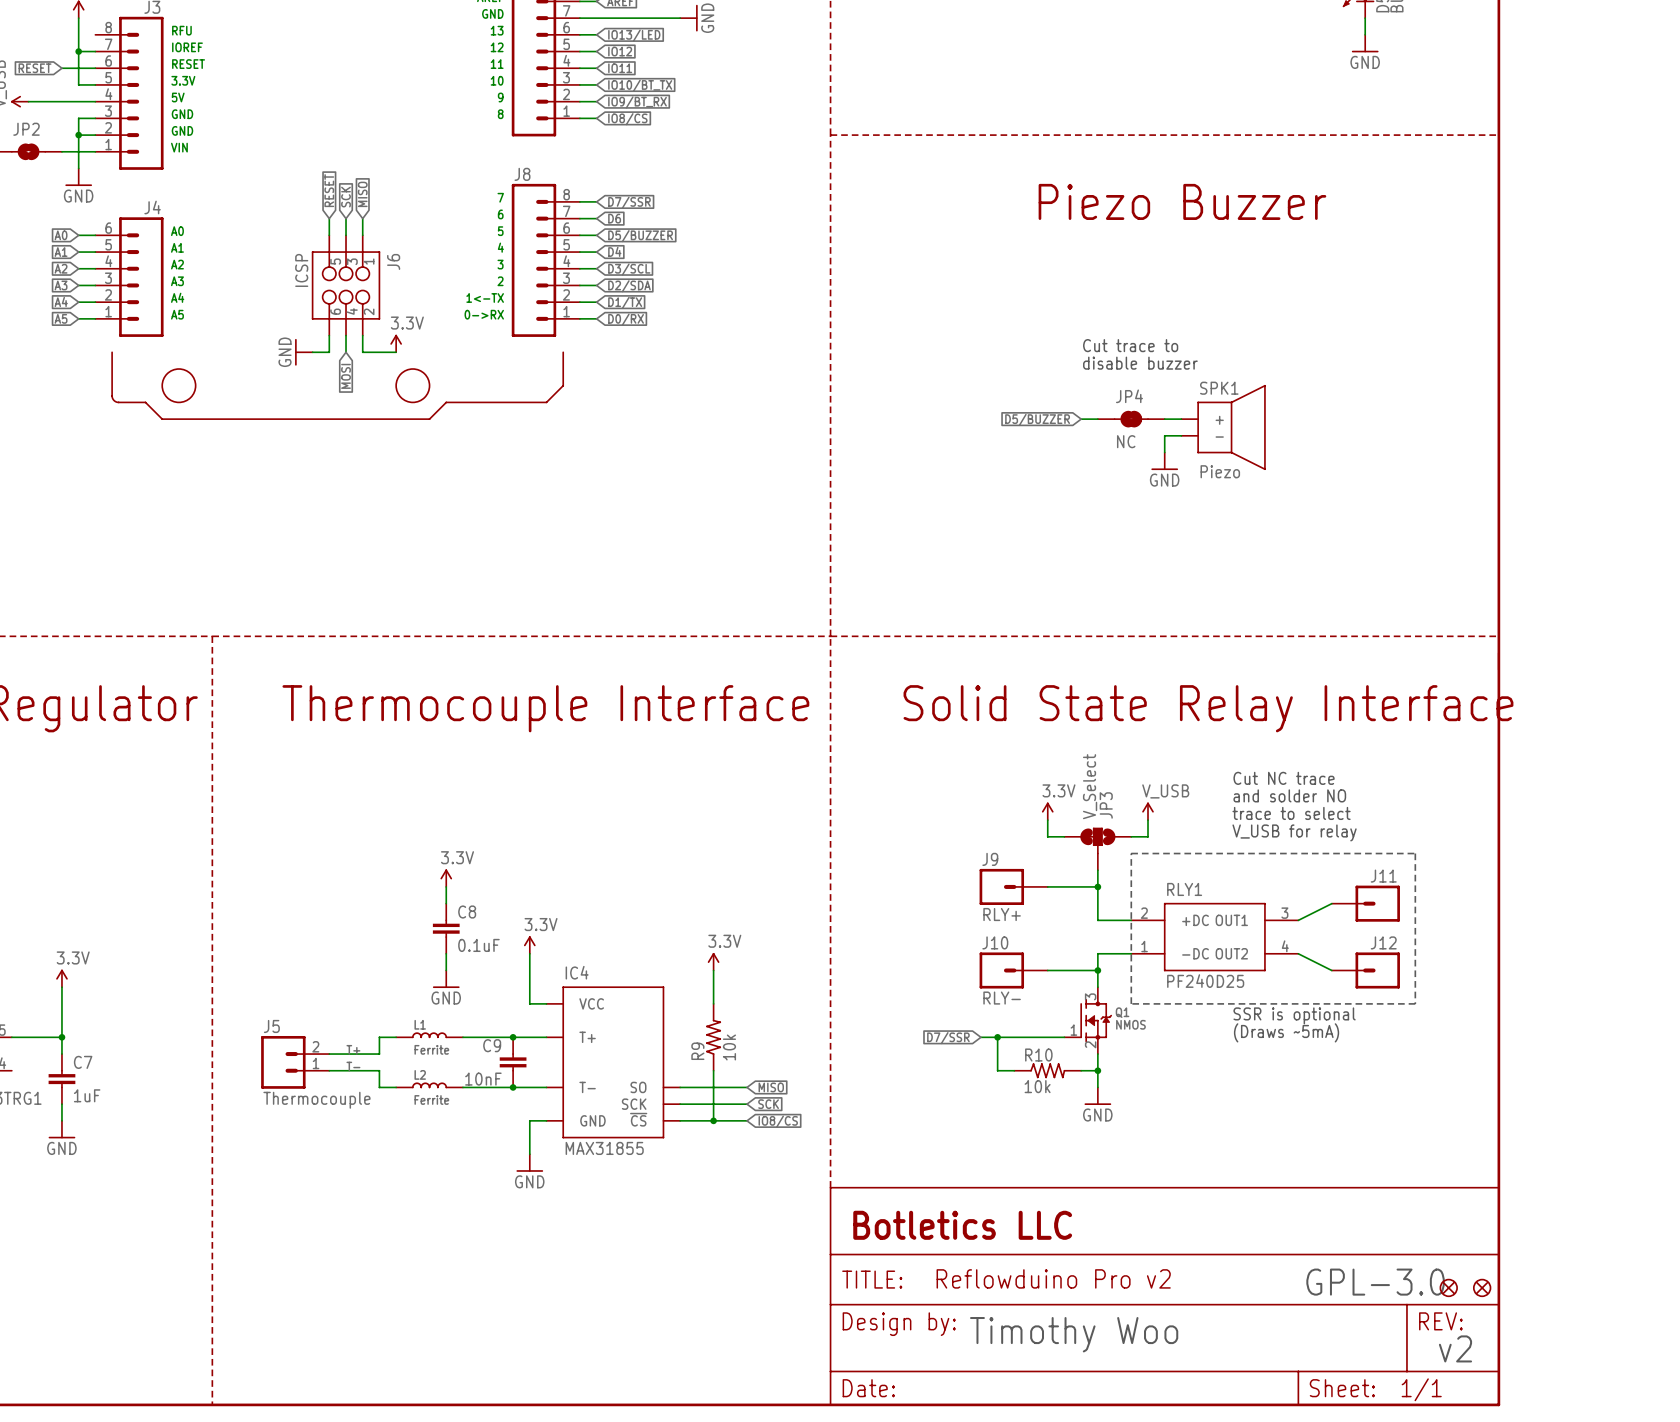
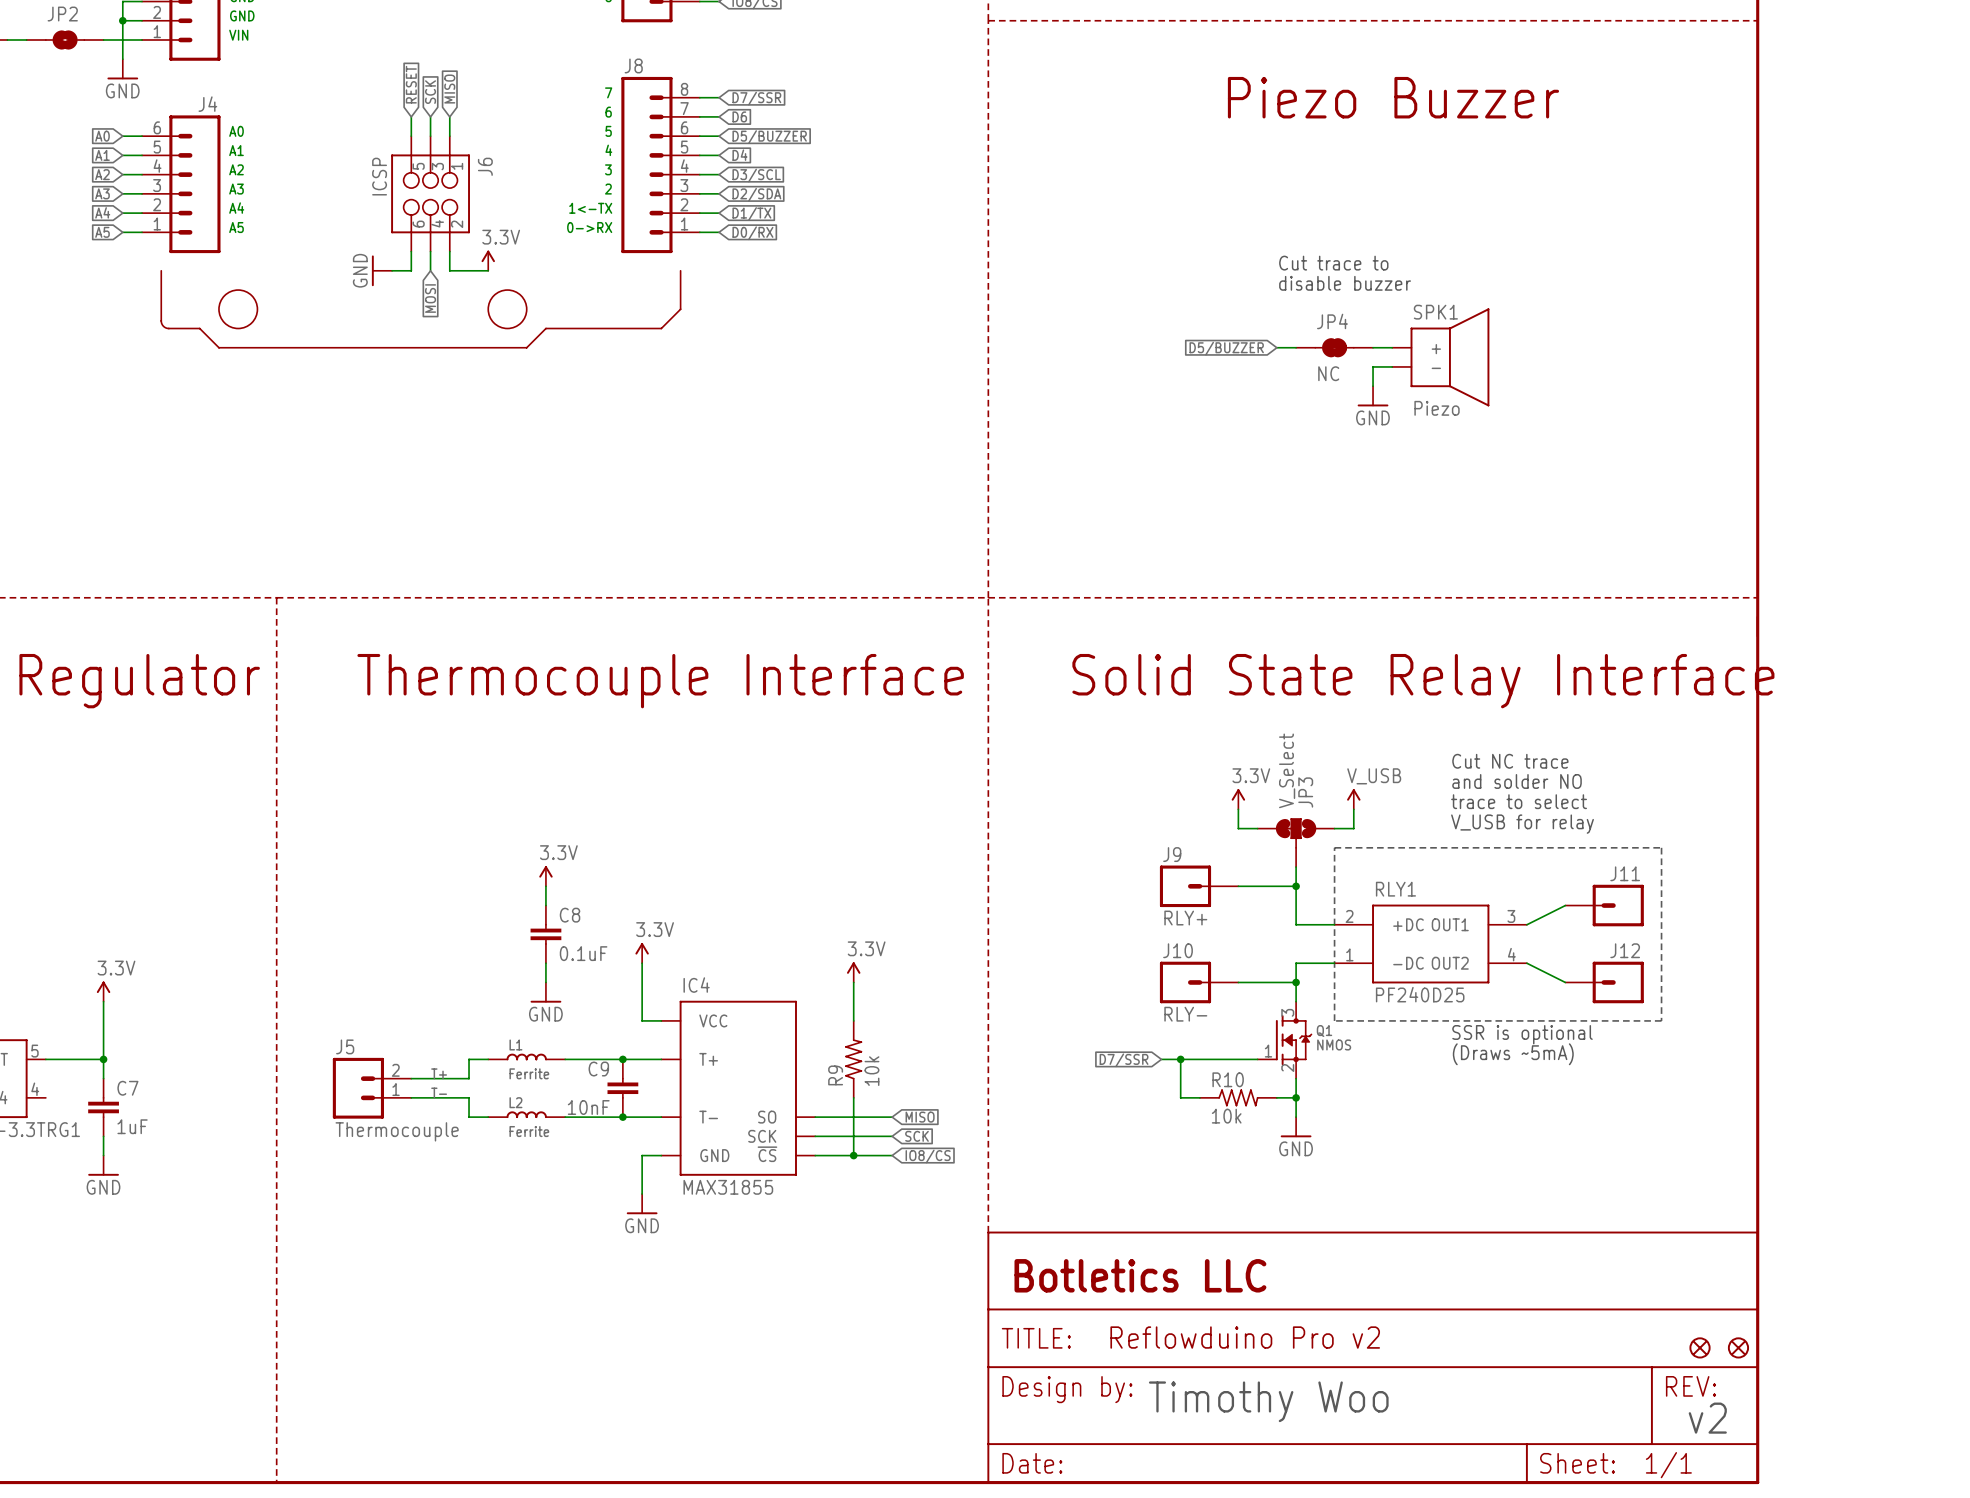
text: GPL-3.0 (1375, 1282) -> none

